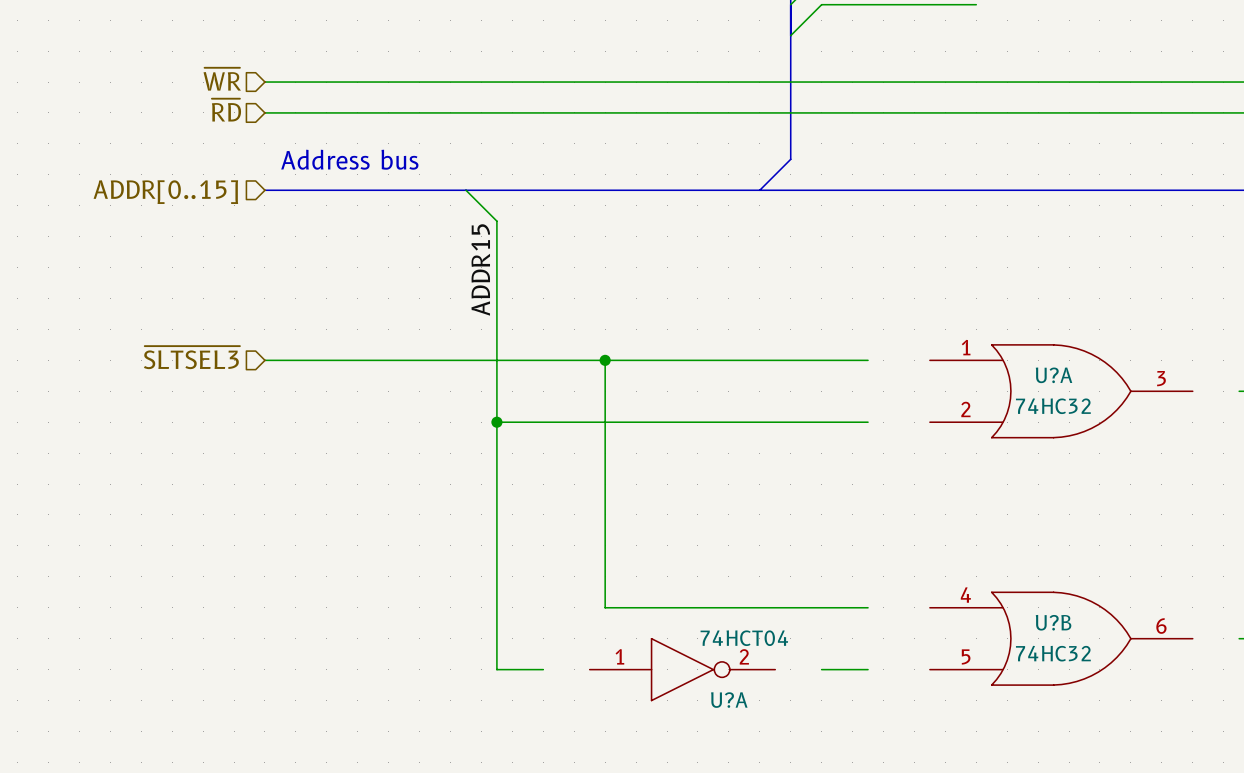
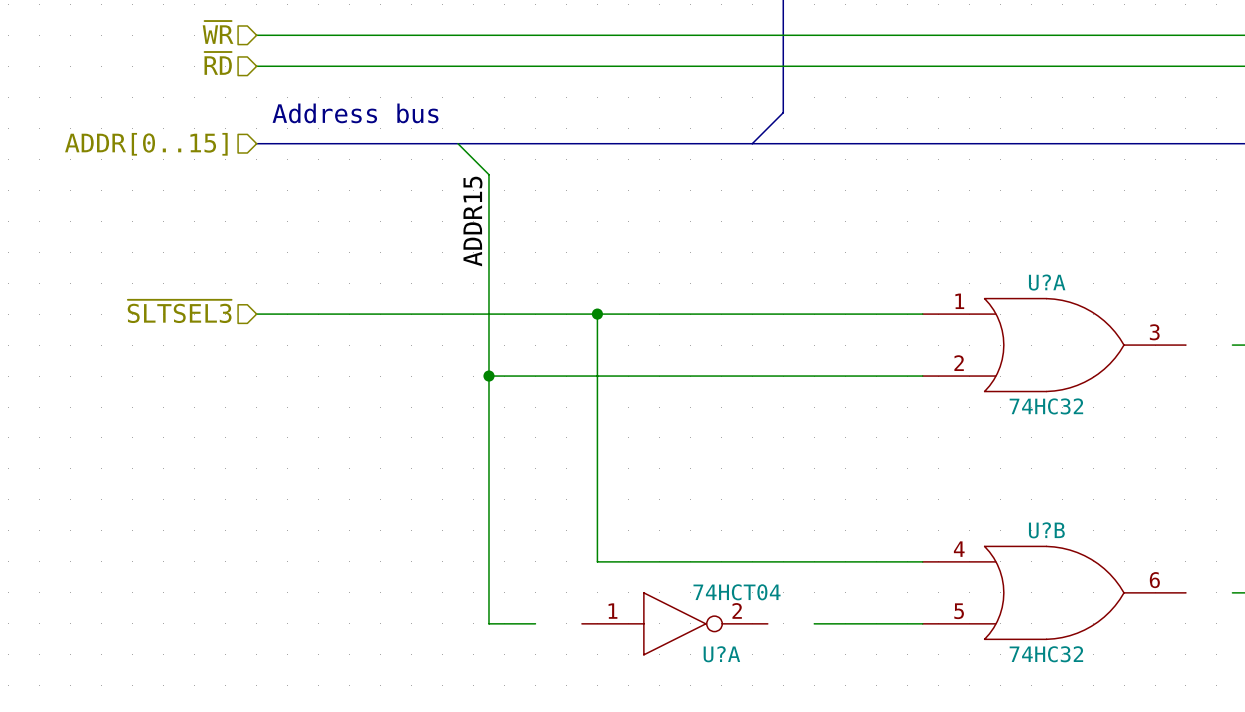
wire: none -> (860, 314) (922, 314)
U?A name position: U?A (1054, 375) -> U?A (1047, 282)
U?A value position: 74HC32 (1053, 406) -> 74HC32 (1046, 406)
wire: none -> (860, 376) (922, 376)
wire: none -> (860, 561) (922, 561)
U?B name position: U?B (1053, 622) -> U?B (1046, 530)
U?B value position: 74HC32 (1053, 653) -> 74HC32 (1046, 654)
wire: none -> (860, 623) (922, 623)

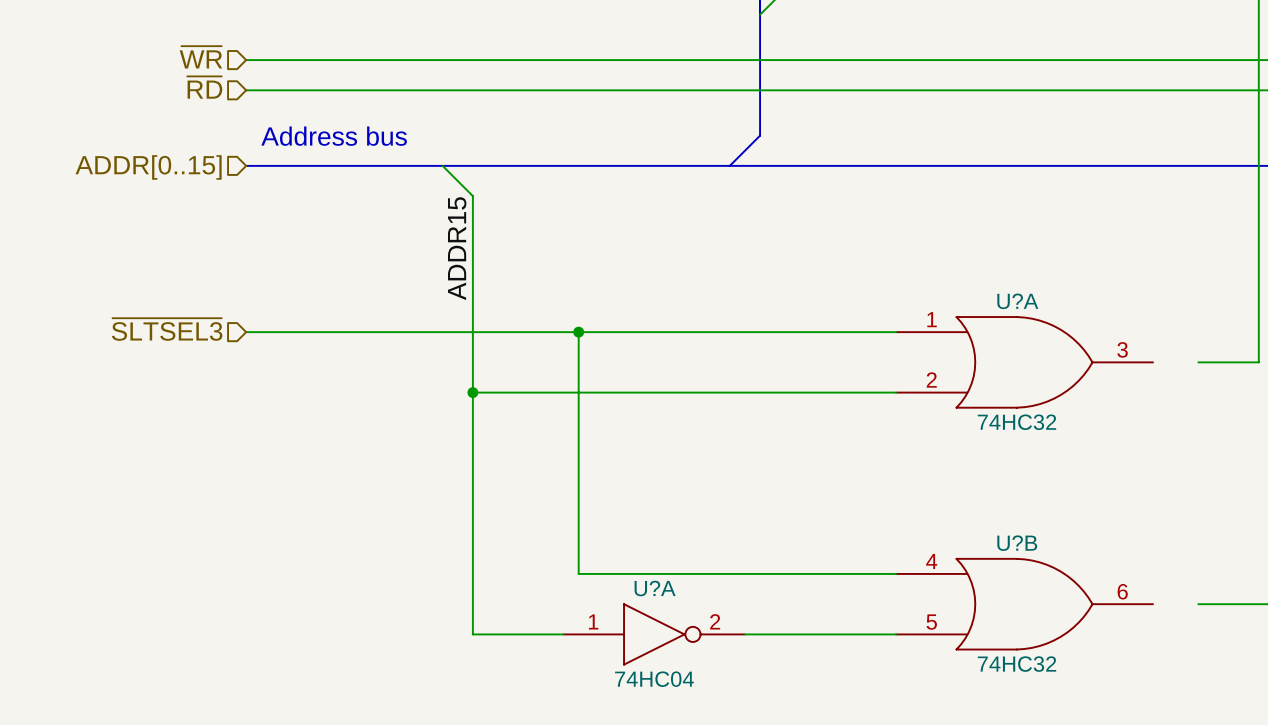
U?A value: 74HCT04 (737, 592) -> 74HC04 (654, 679)
wire: none -> (518, 634) (563, 634)
wire: none -> (744, 634) (790, 634)
U?A name position: U?A (721, 654) -> U?A (655, 588)

